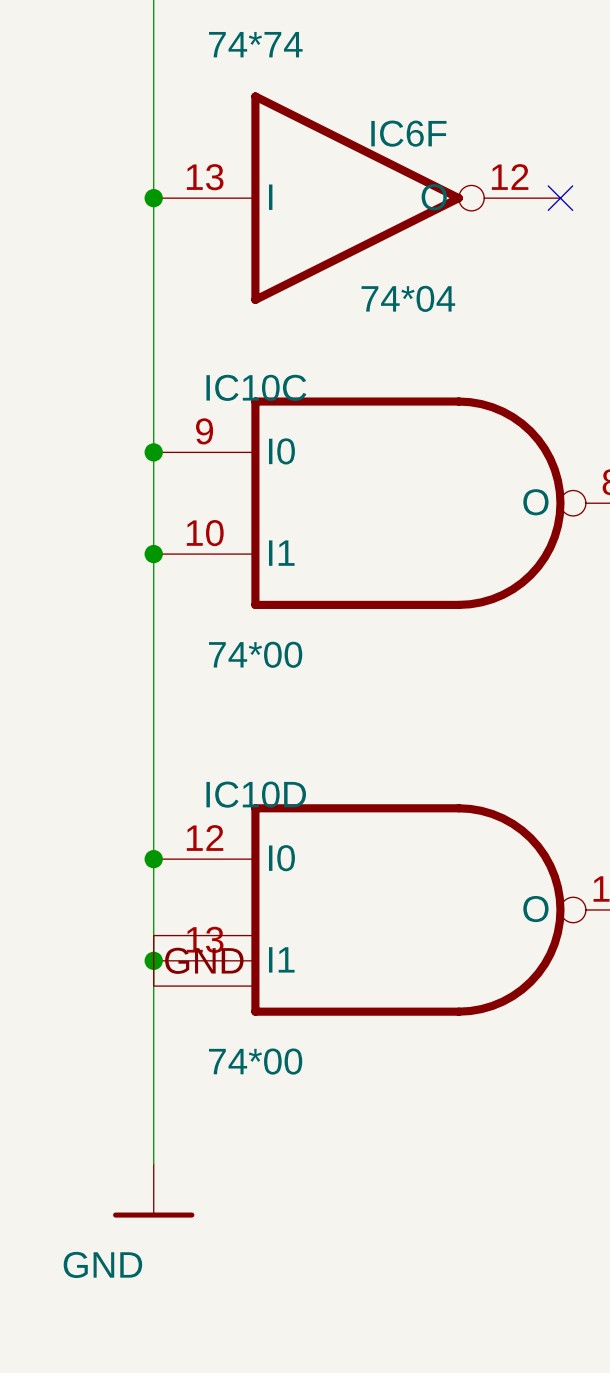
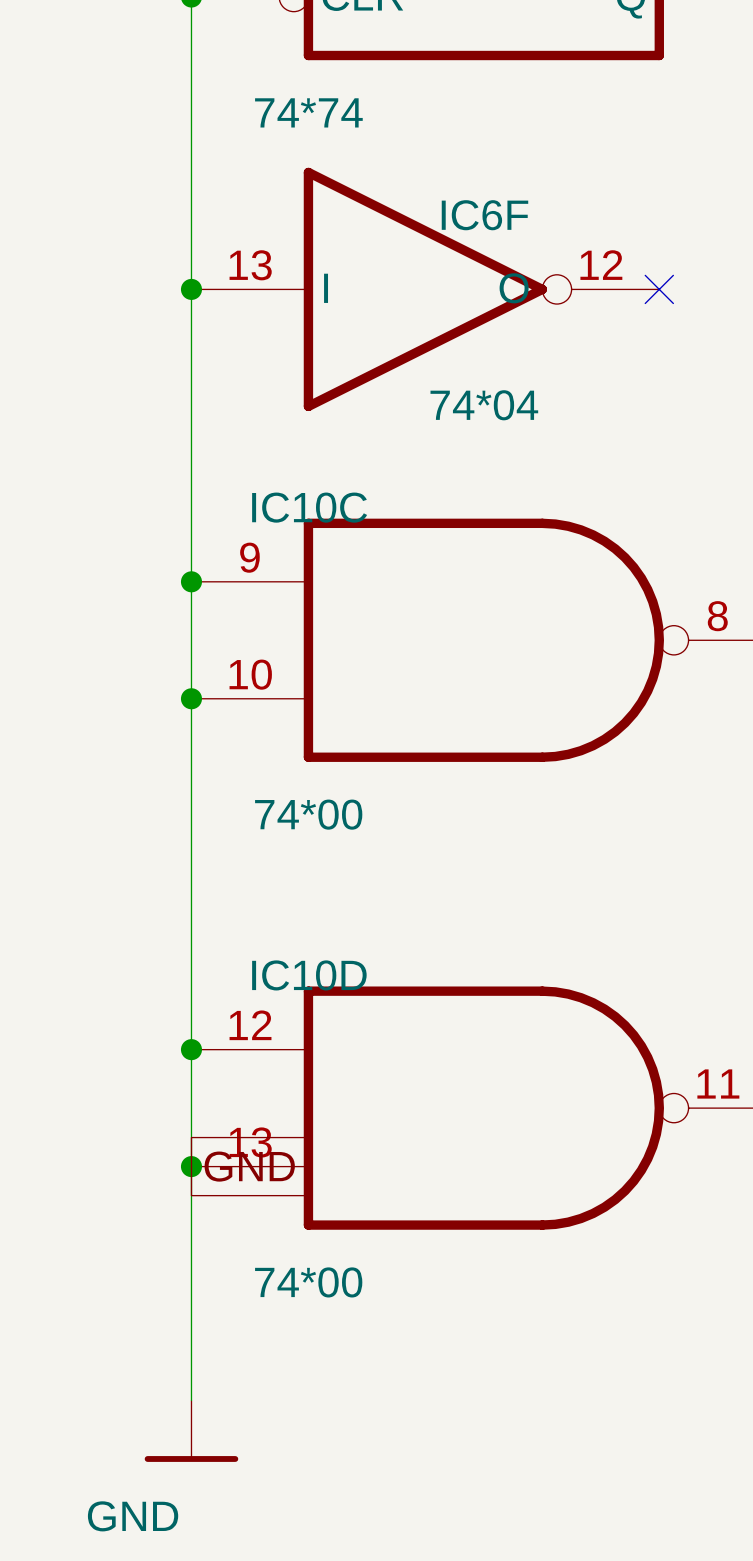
IC10C pin name: I0 (281, 451) -> none
IC10C pin name: O (535, 502) -> none
IC10C pin name: I1 (281, 553) -> none
IC10D pin name: I0 (281, 858) -> none
IC10D pin name: O (535, 909) -> none
IC10D pin name: I1 (281, 959) -> none

